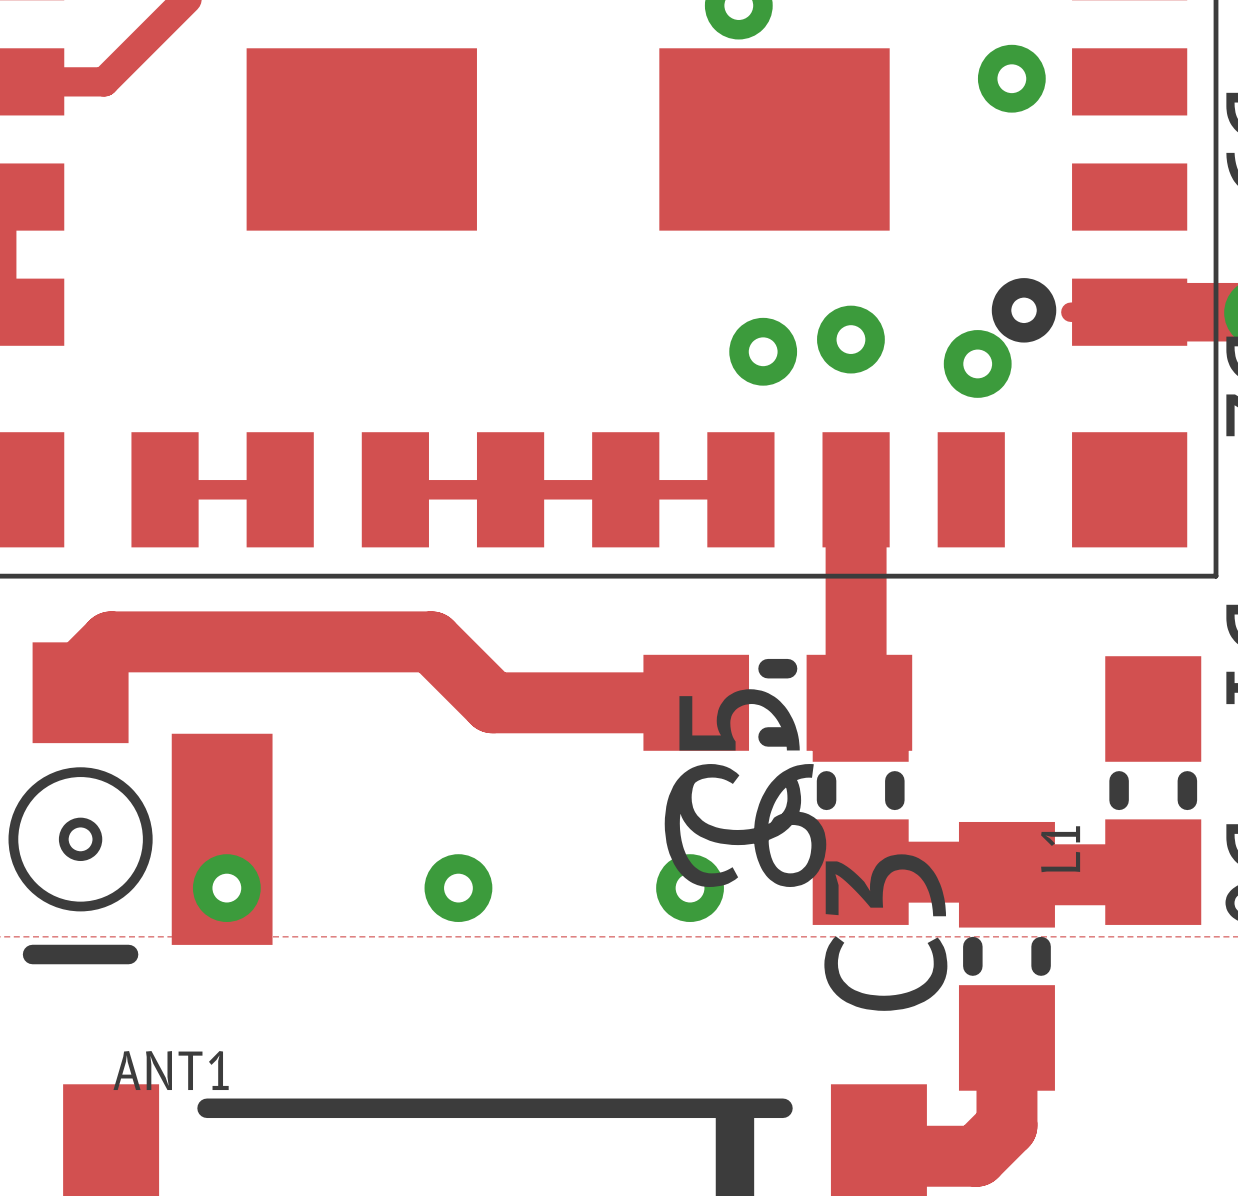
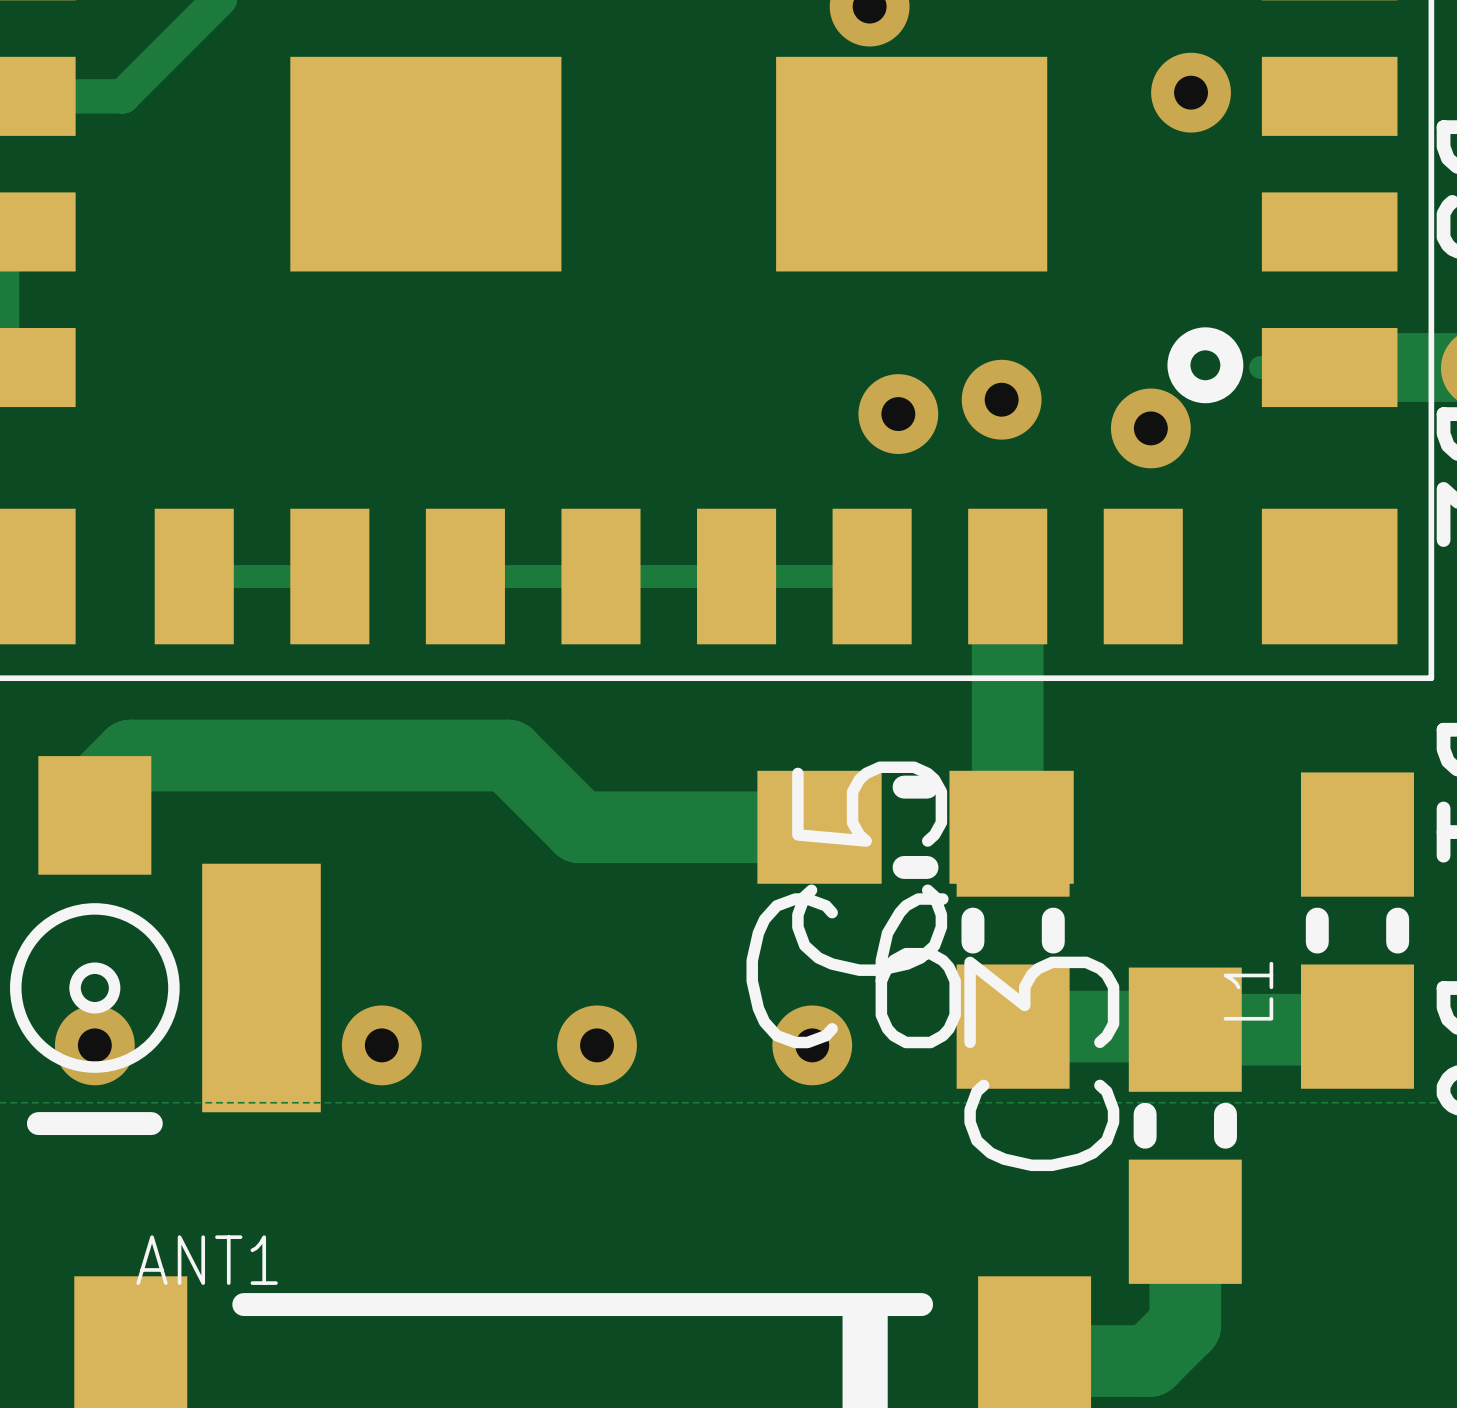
via: none -> (94, 1045)
via: (226, 888) -> none
via: none -> (381, 1045)
via position: (458, 888) -> (597, 1045)

